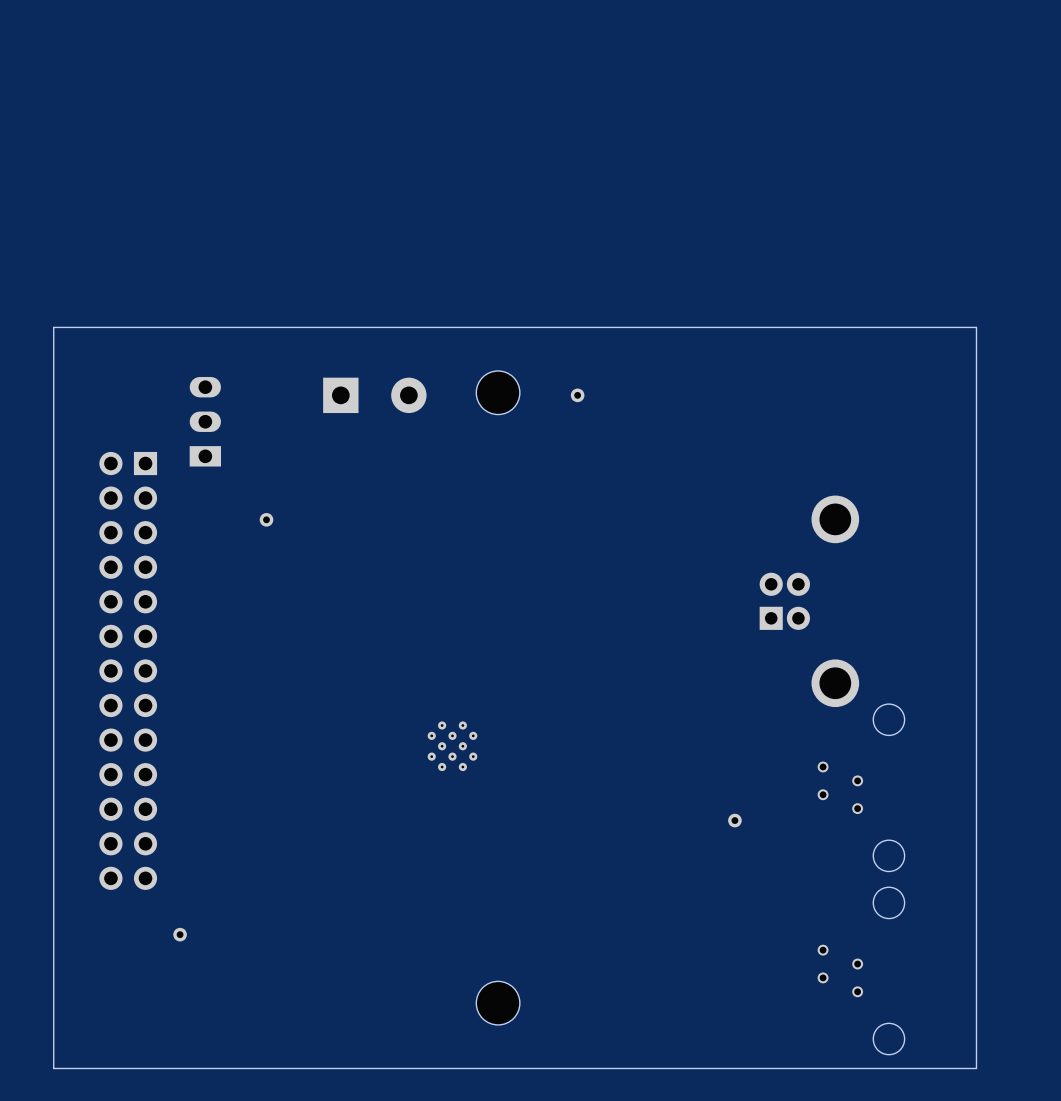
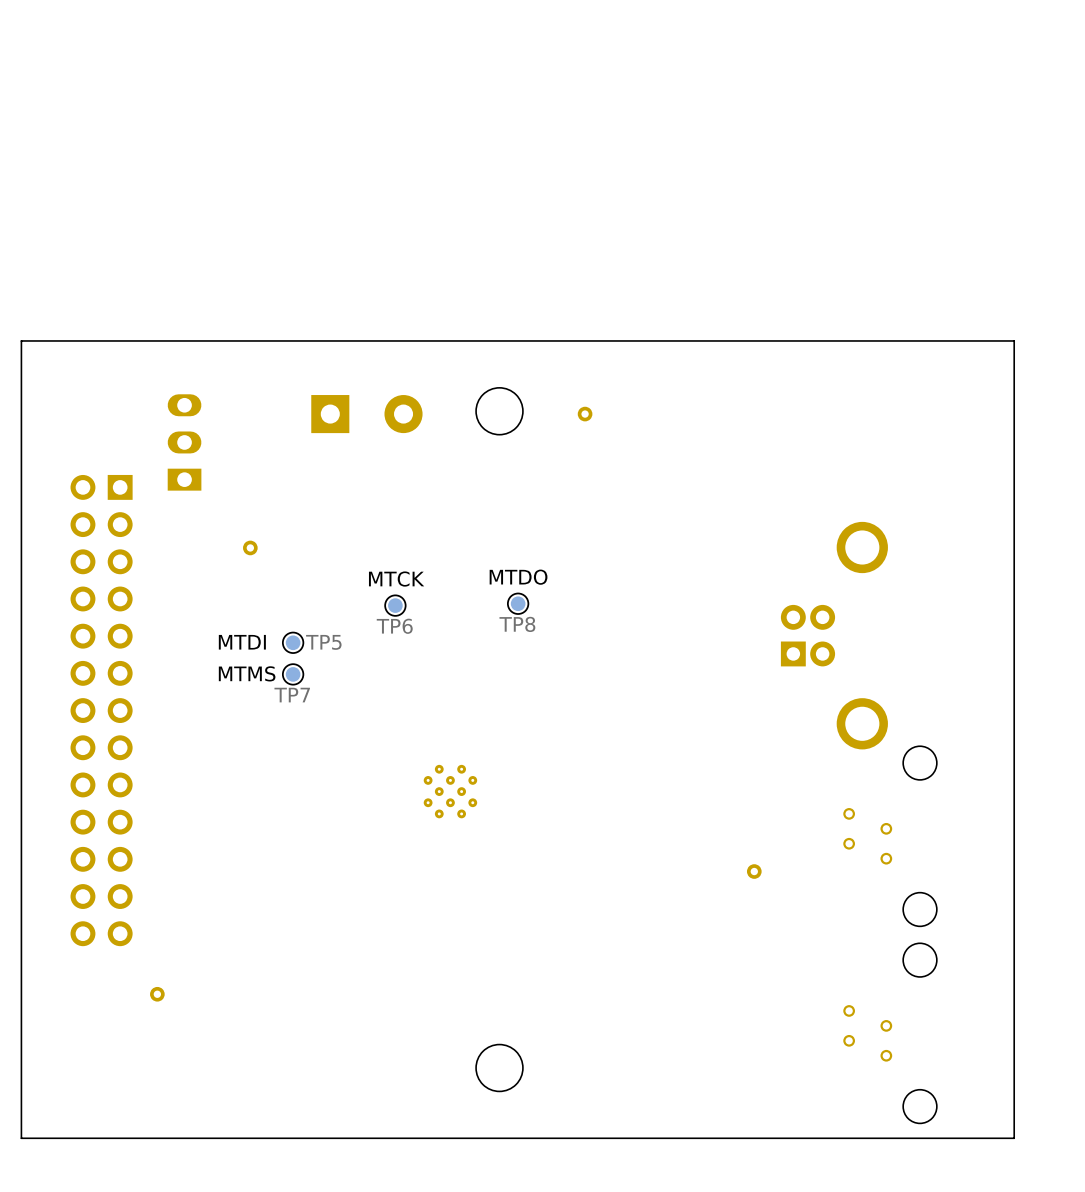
TP8: none -> MTDO (518, 603)
TP6: none -> MTCK (395, 605)
TP5: none -> MTDI (293, 642)
TP7: none -> MTMS (293, 674)

